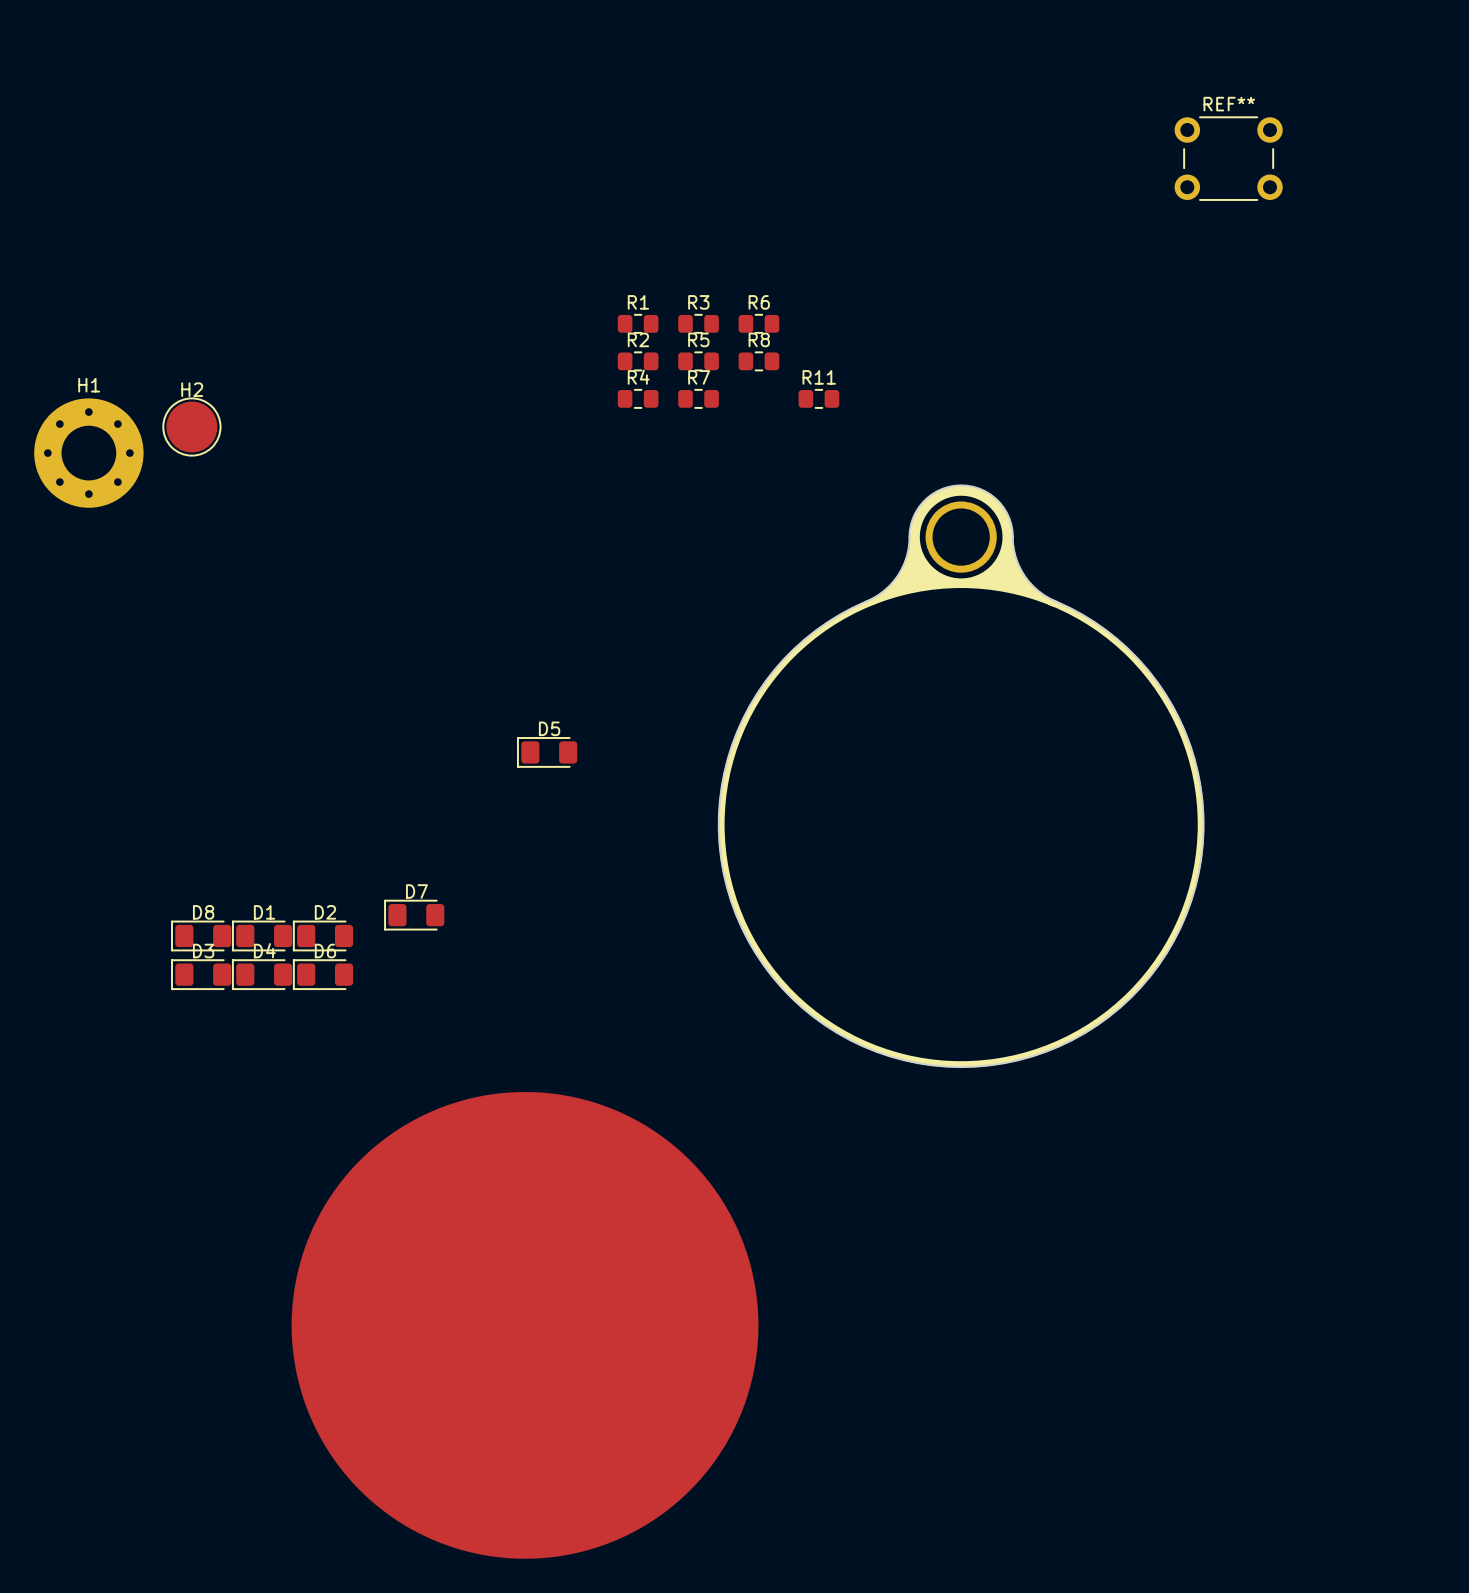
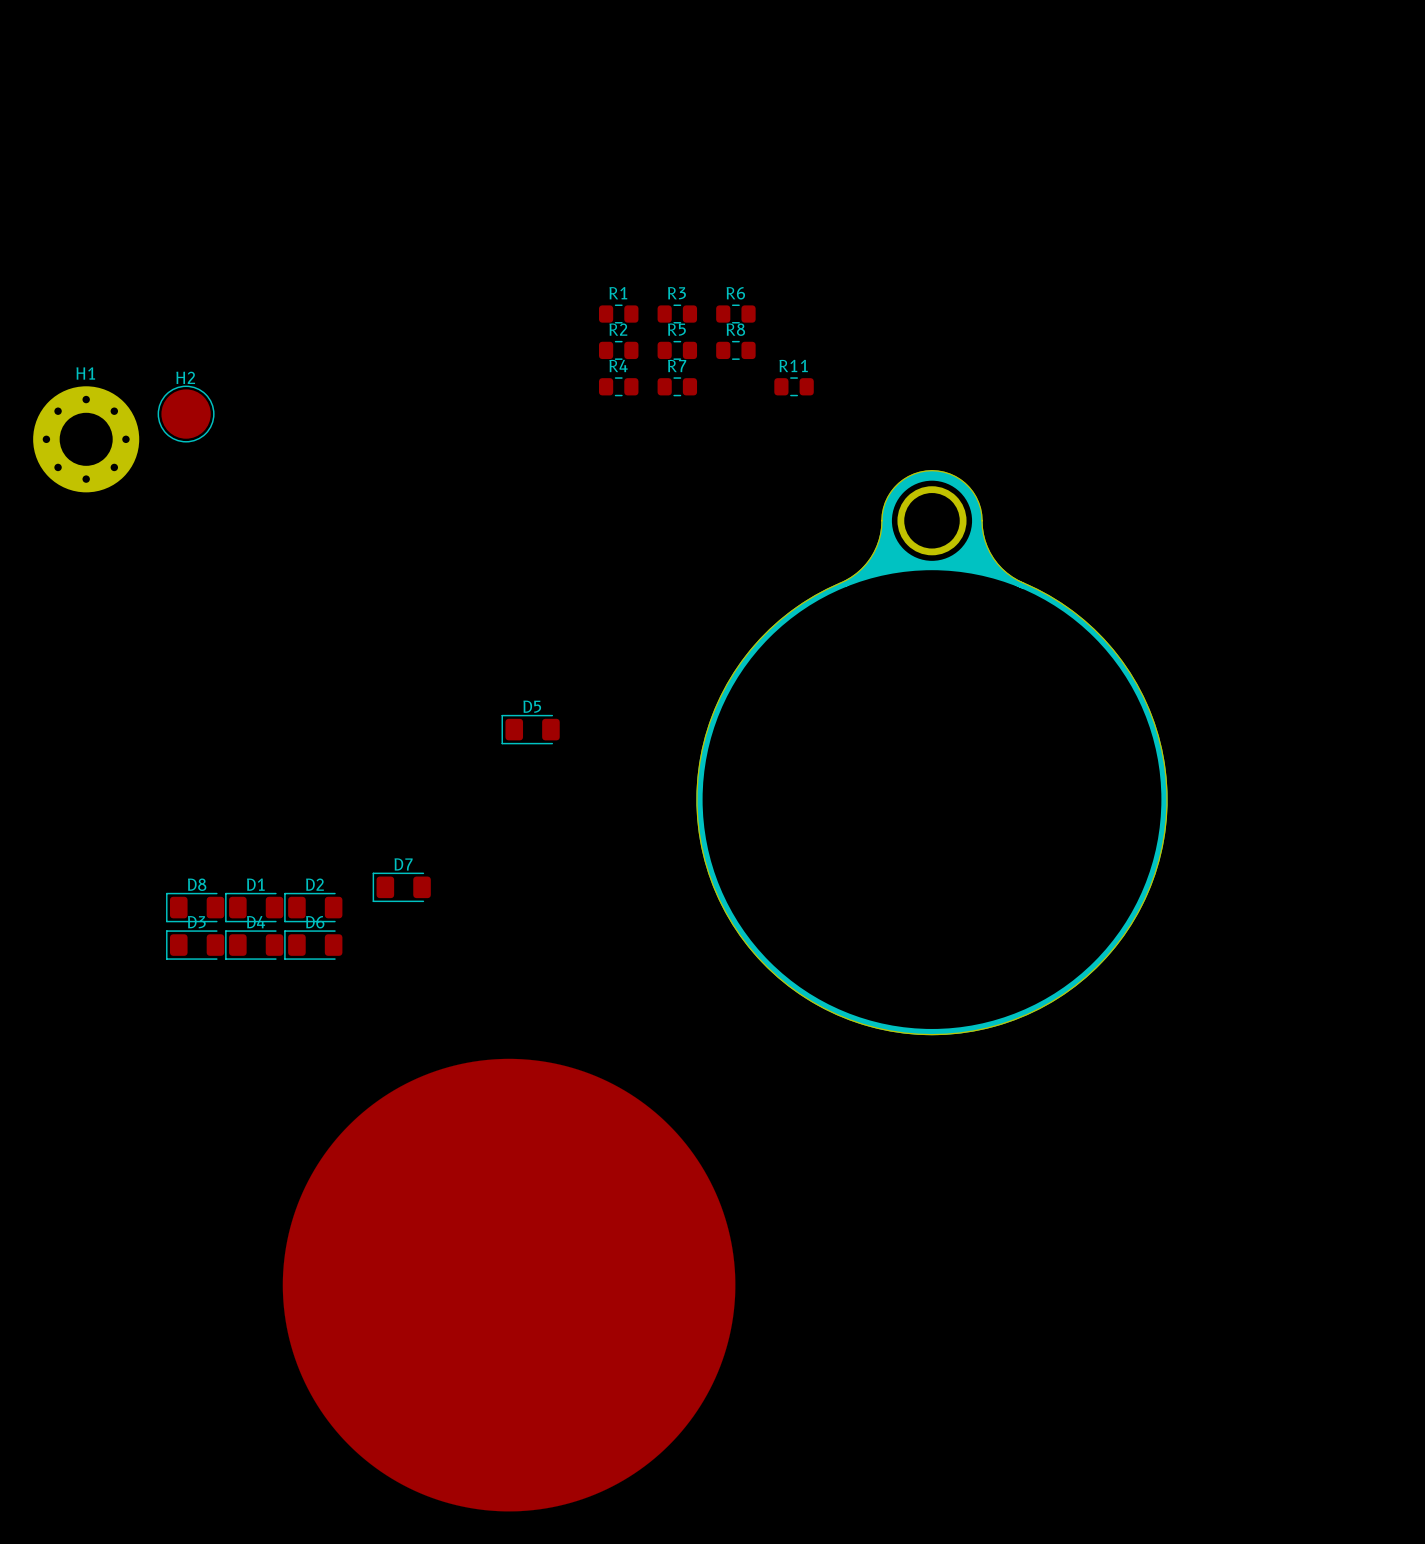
REF**: (1228, 158) -> none

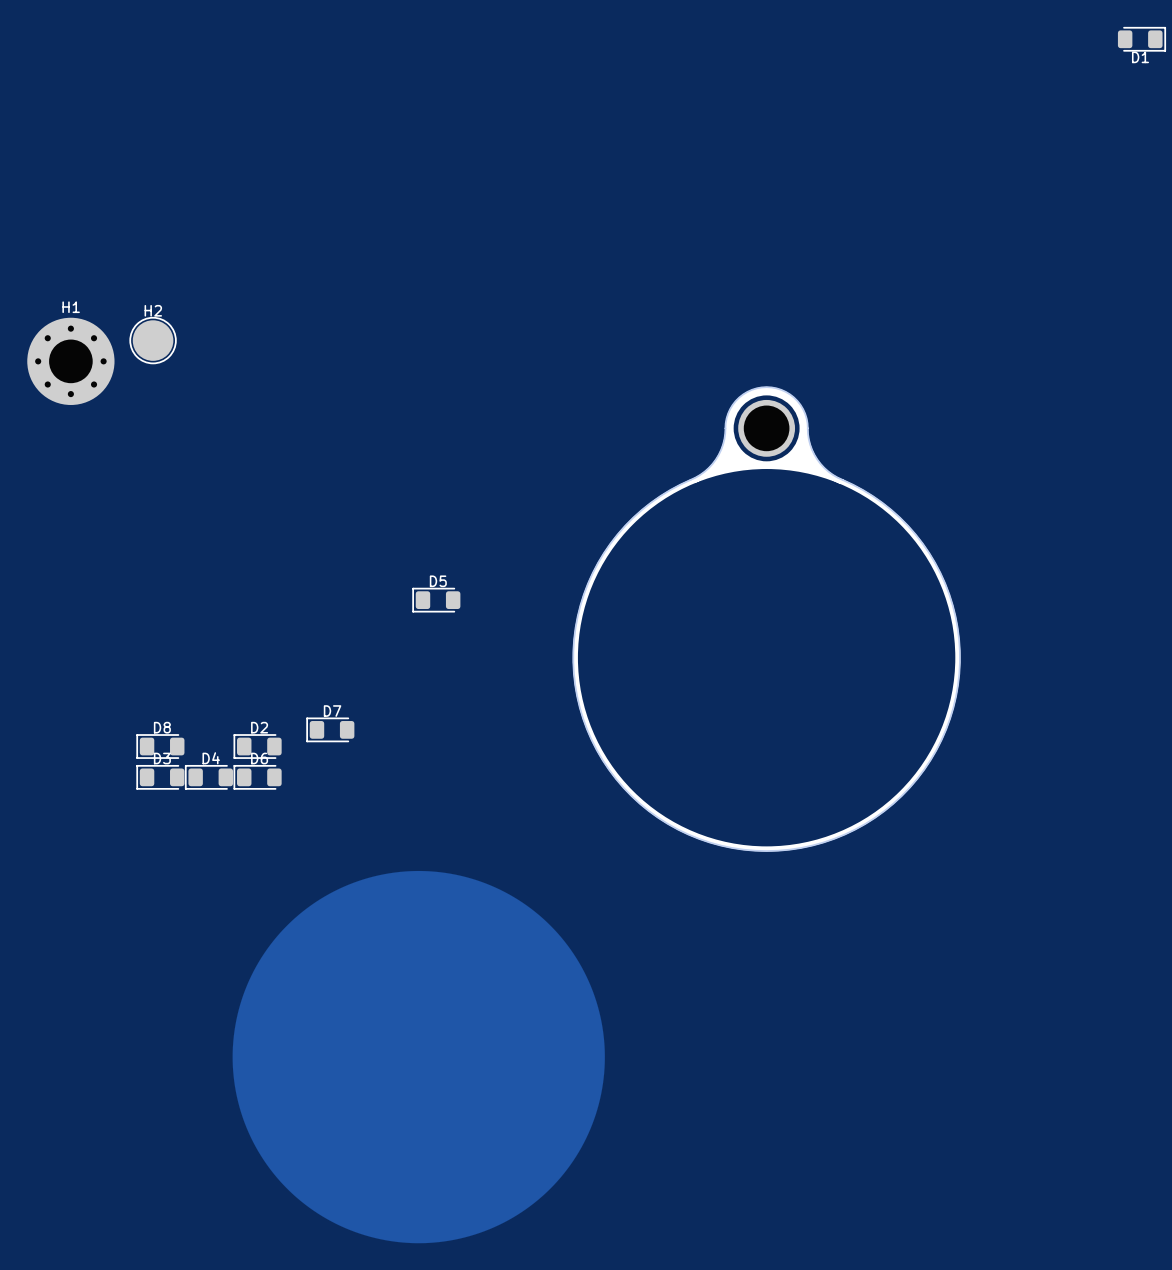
R1: (618, 314) -> none
R3: (677, 314) -> none
R6: (735, 314) -> none
R2: (618, 350) -> none
R5: (677, 350) -> none
R8: (735, 350) -> none
R4: (618, 386) -> none
R7: (677, 386) -> none
R11: (794, 386) -> none
D1 rotation: 0° (254, 907) -> 180° (1141, 39)
D1 position: (254, 907) -> (1141, 39)

